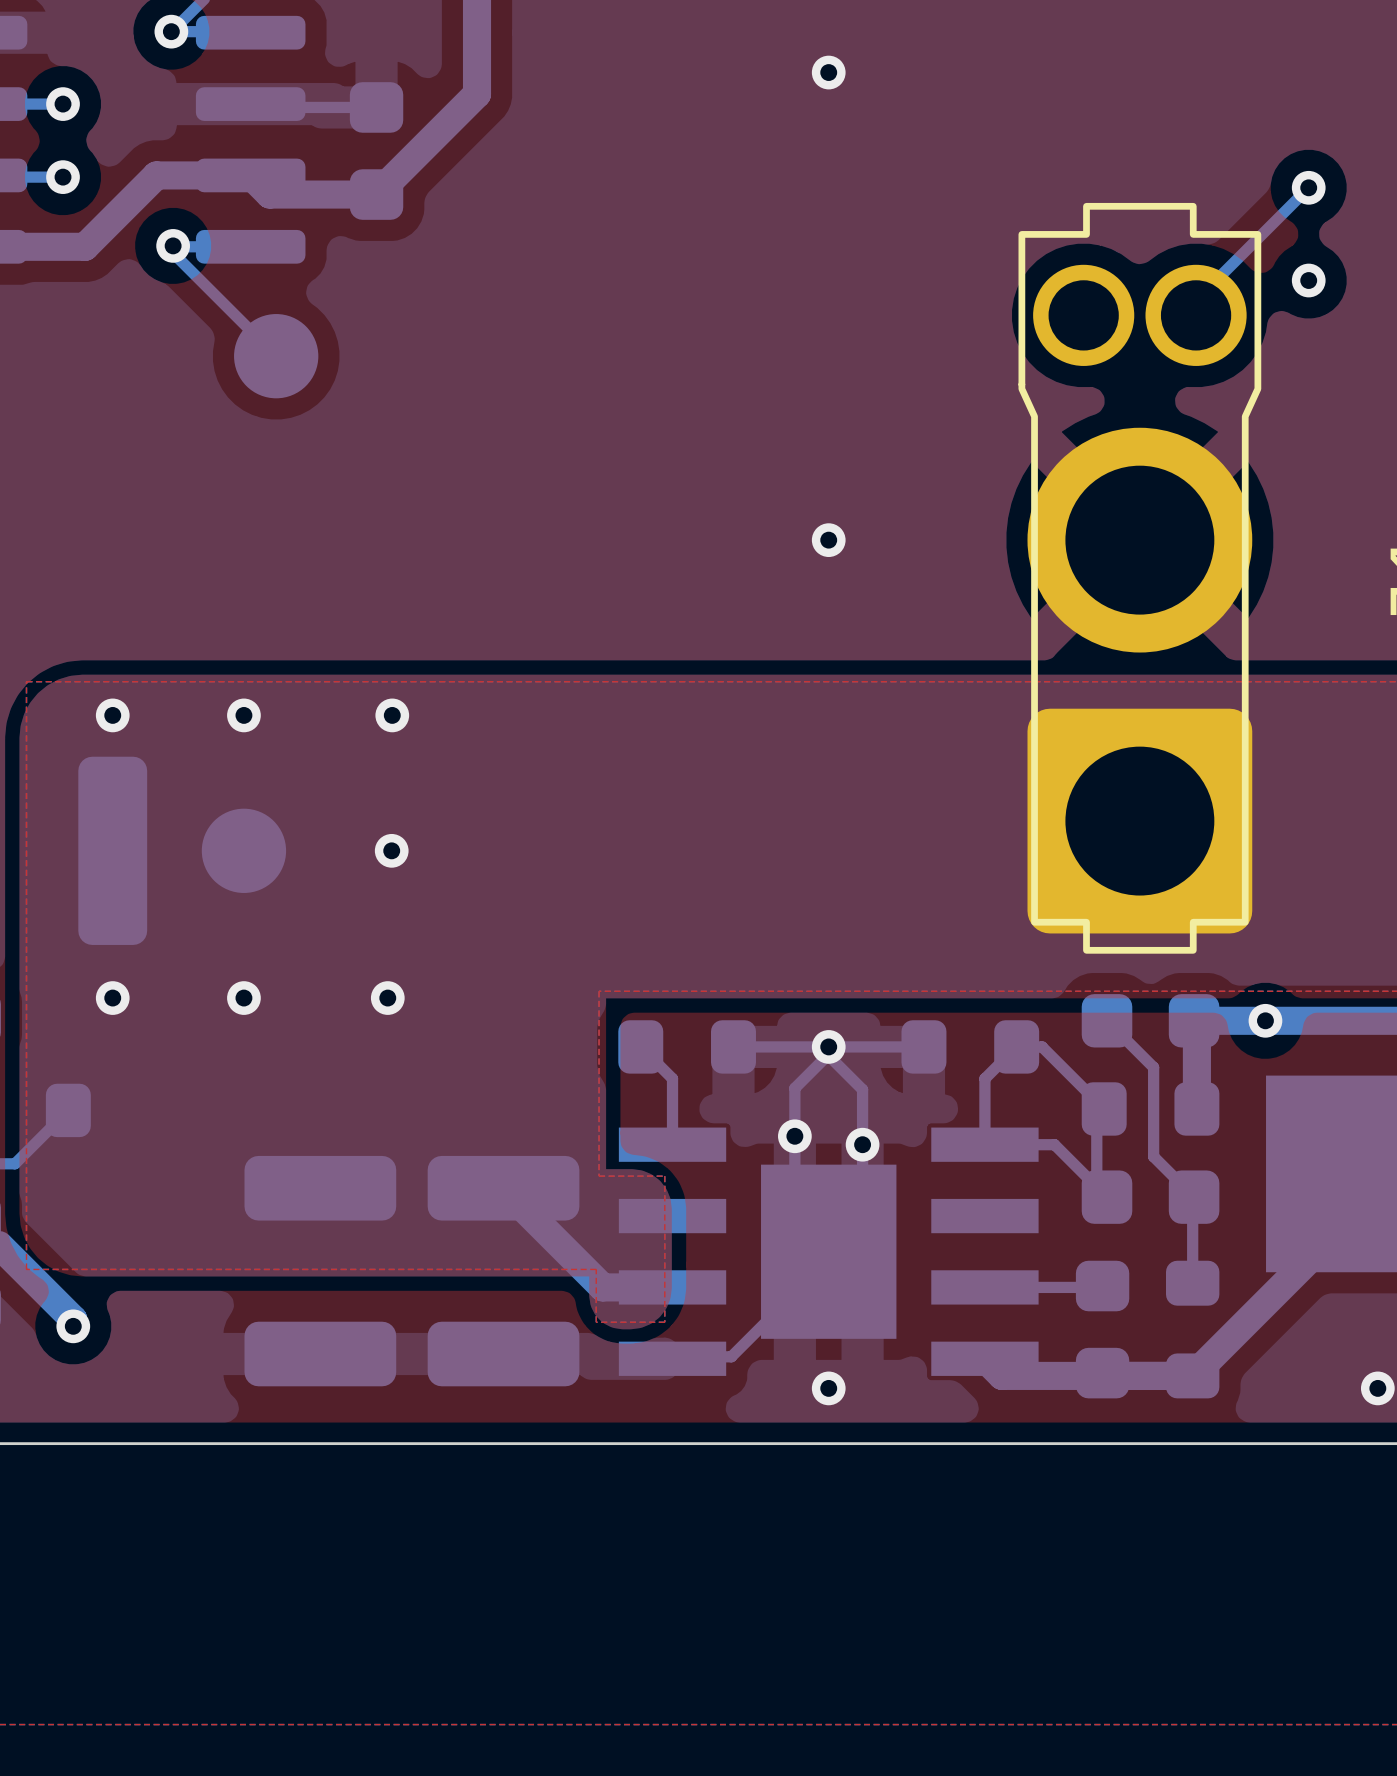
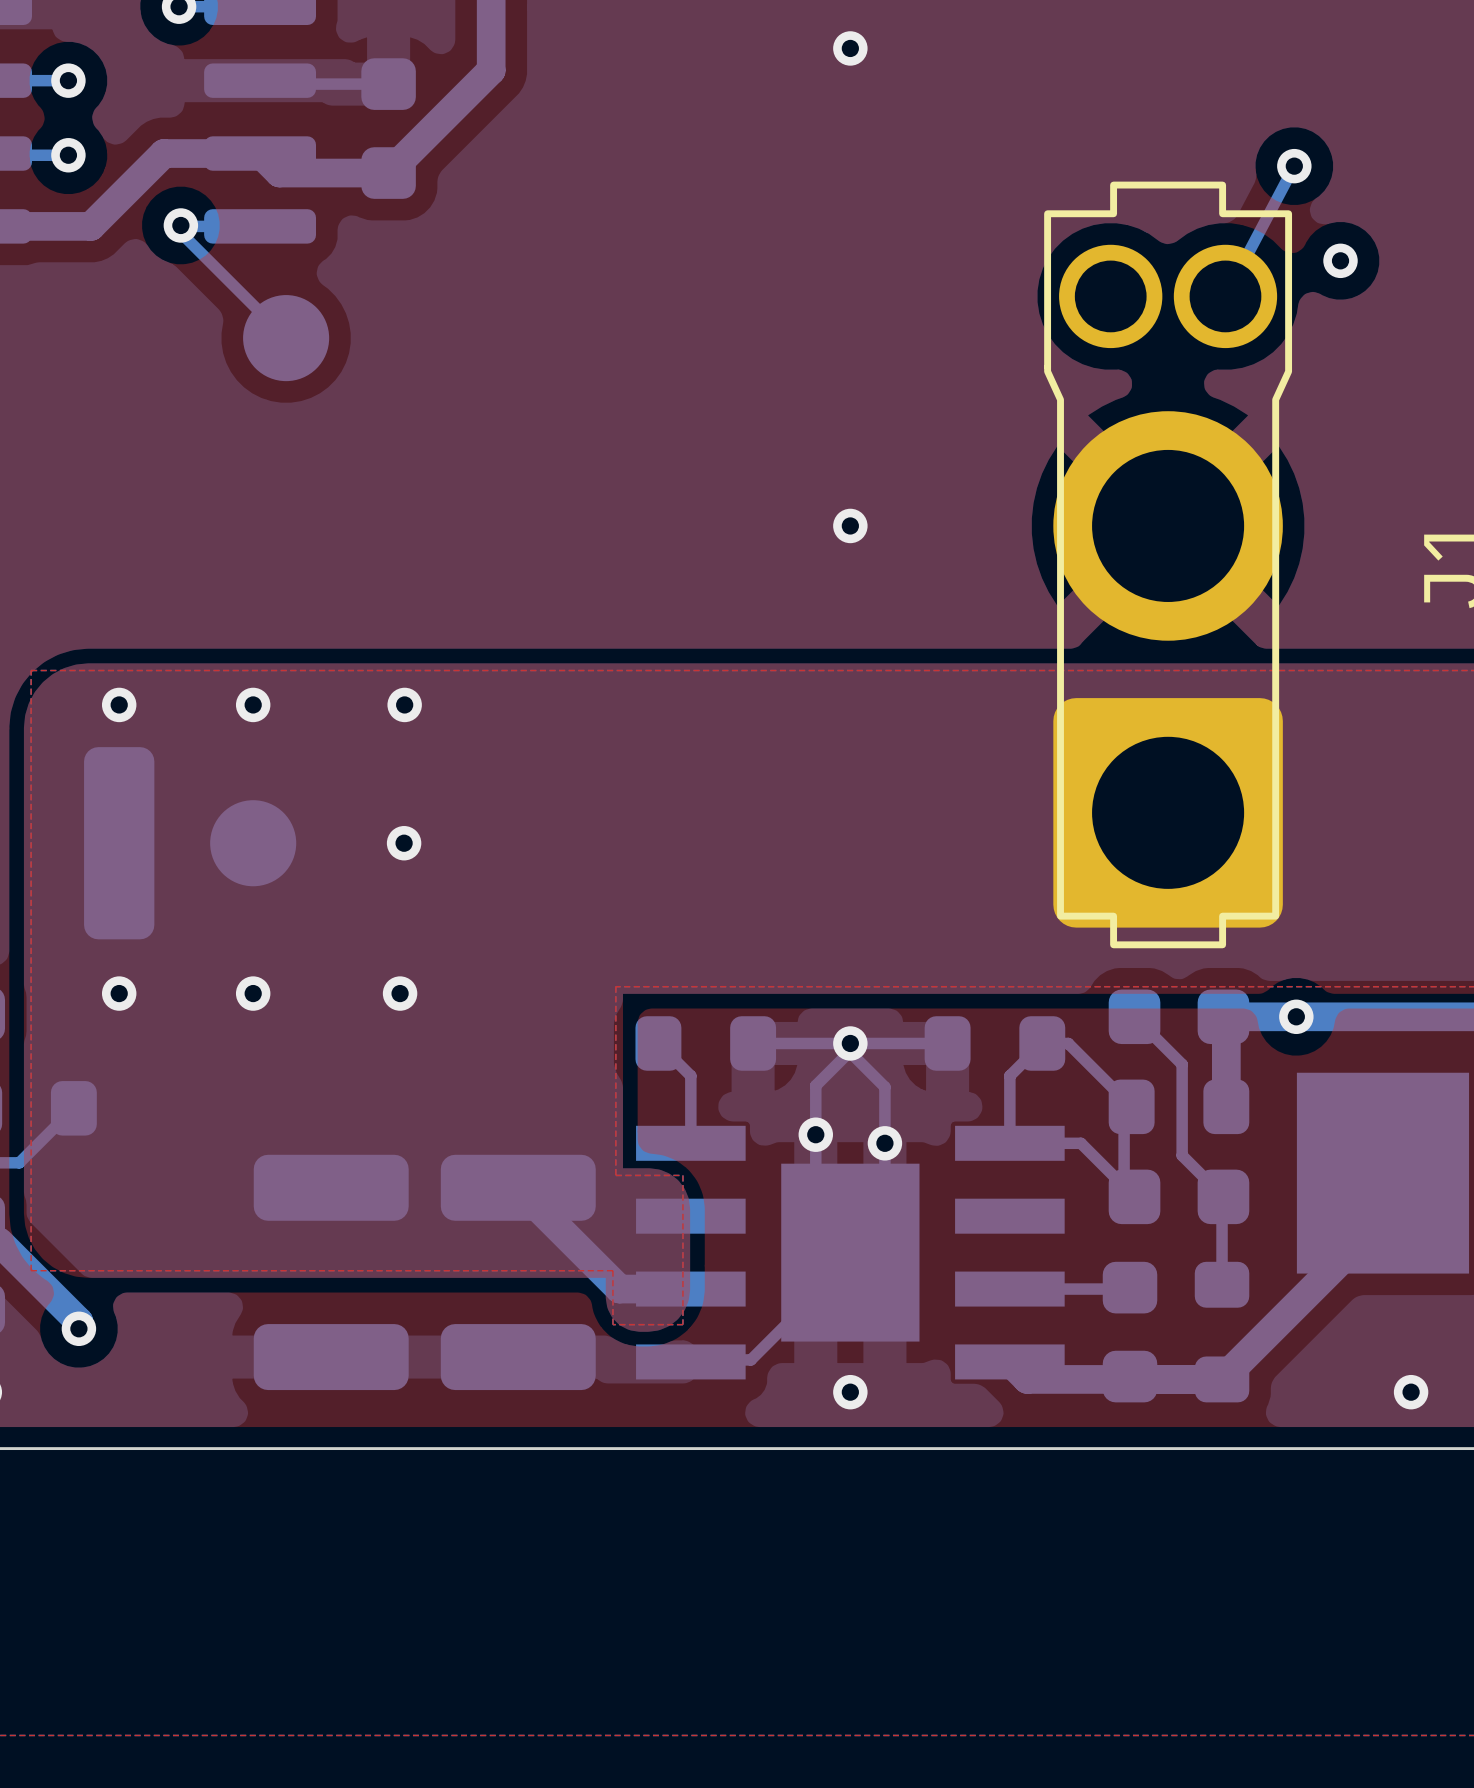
bottom track: (1308, 187) (1196, 300) (1196, 315) -> (1294, 166) (1225, 296)
via position: (1308, 187) -> (1294, 166)

